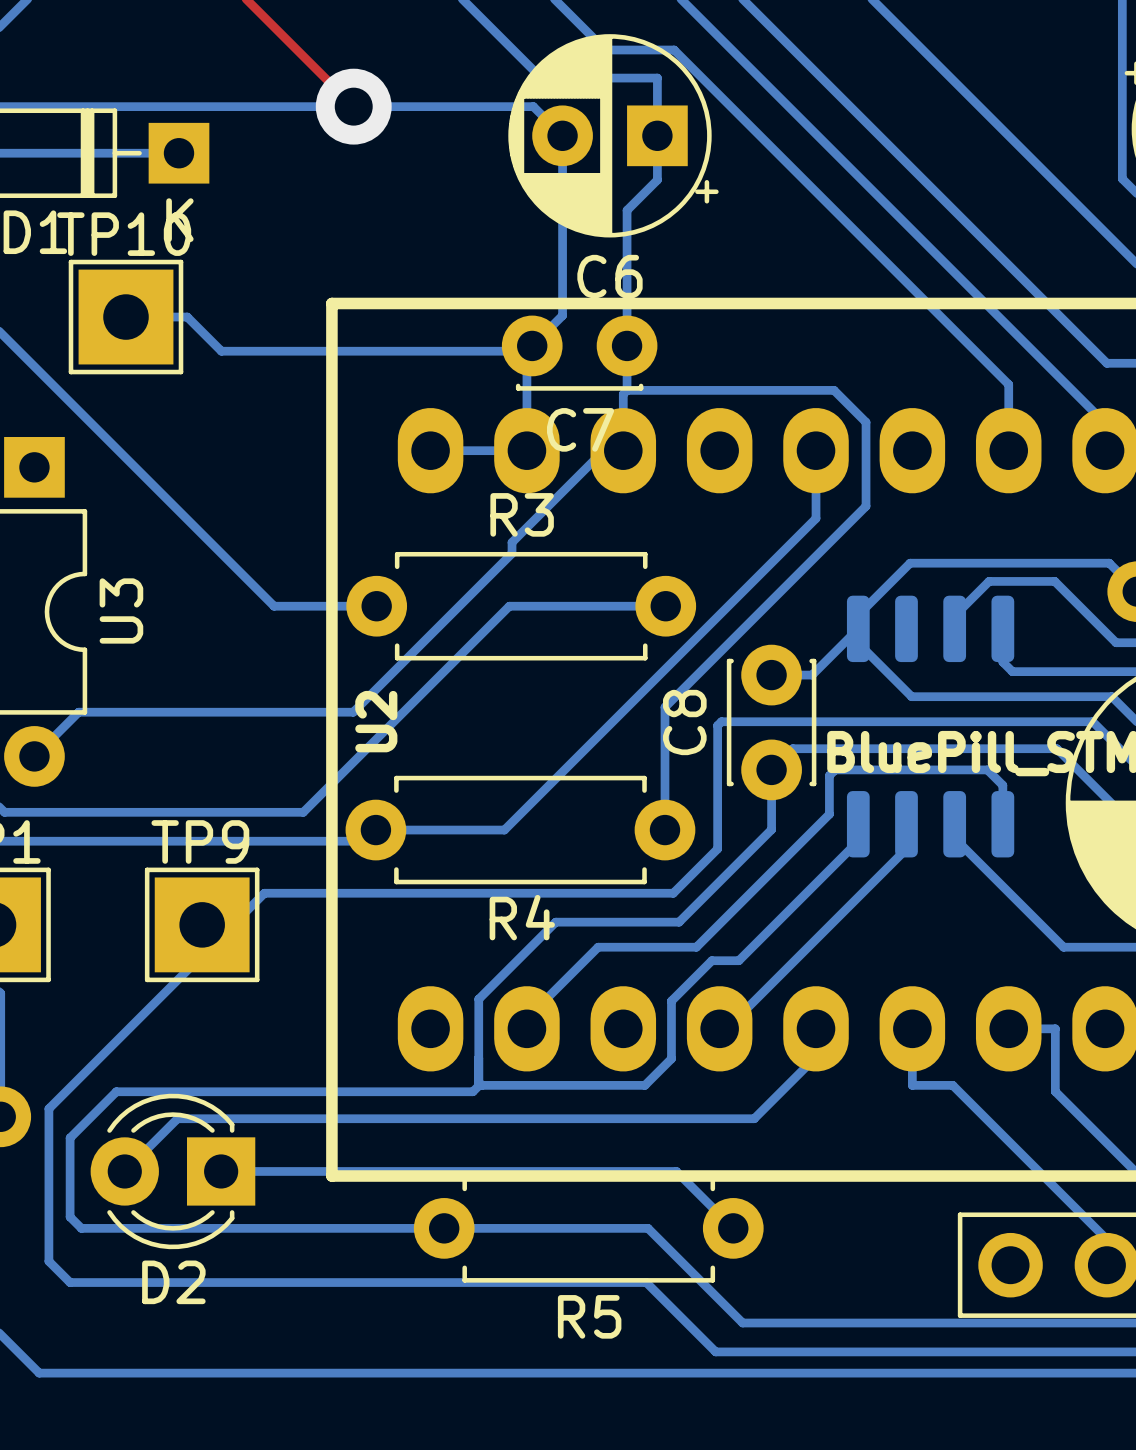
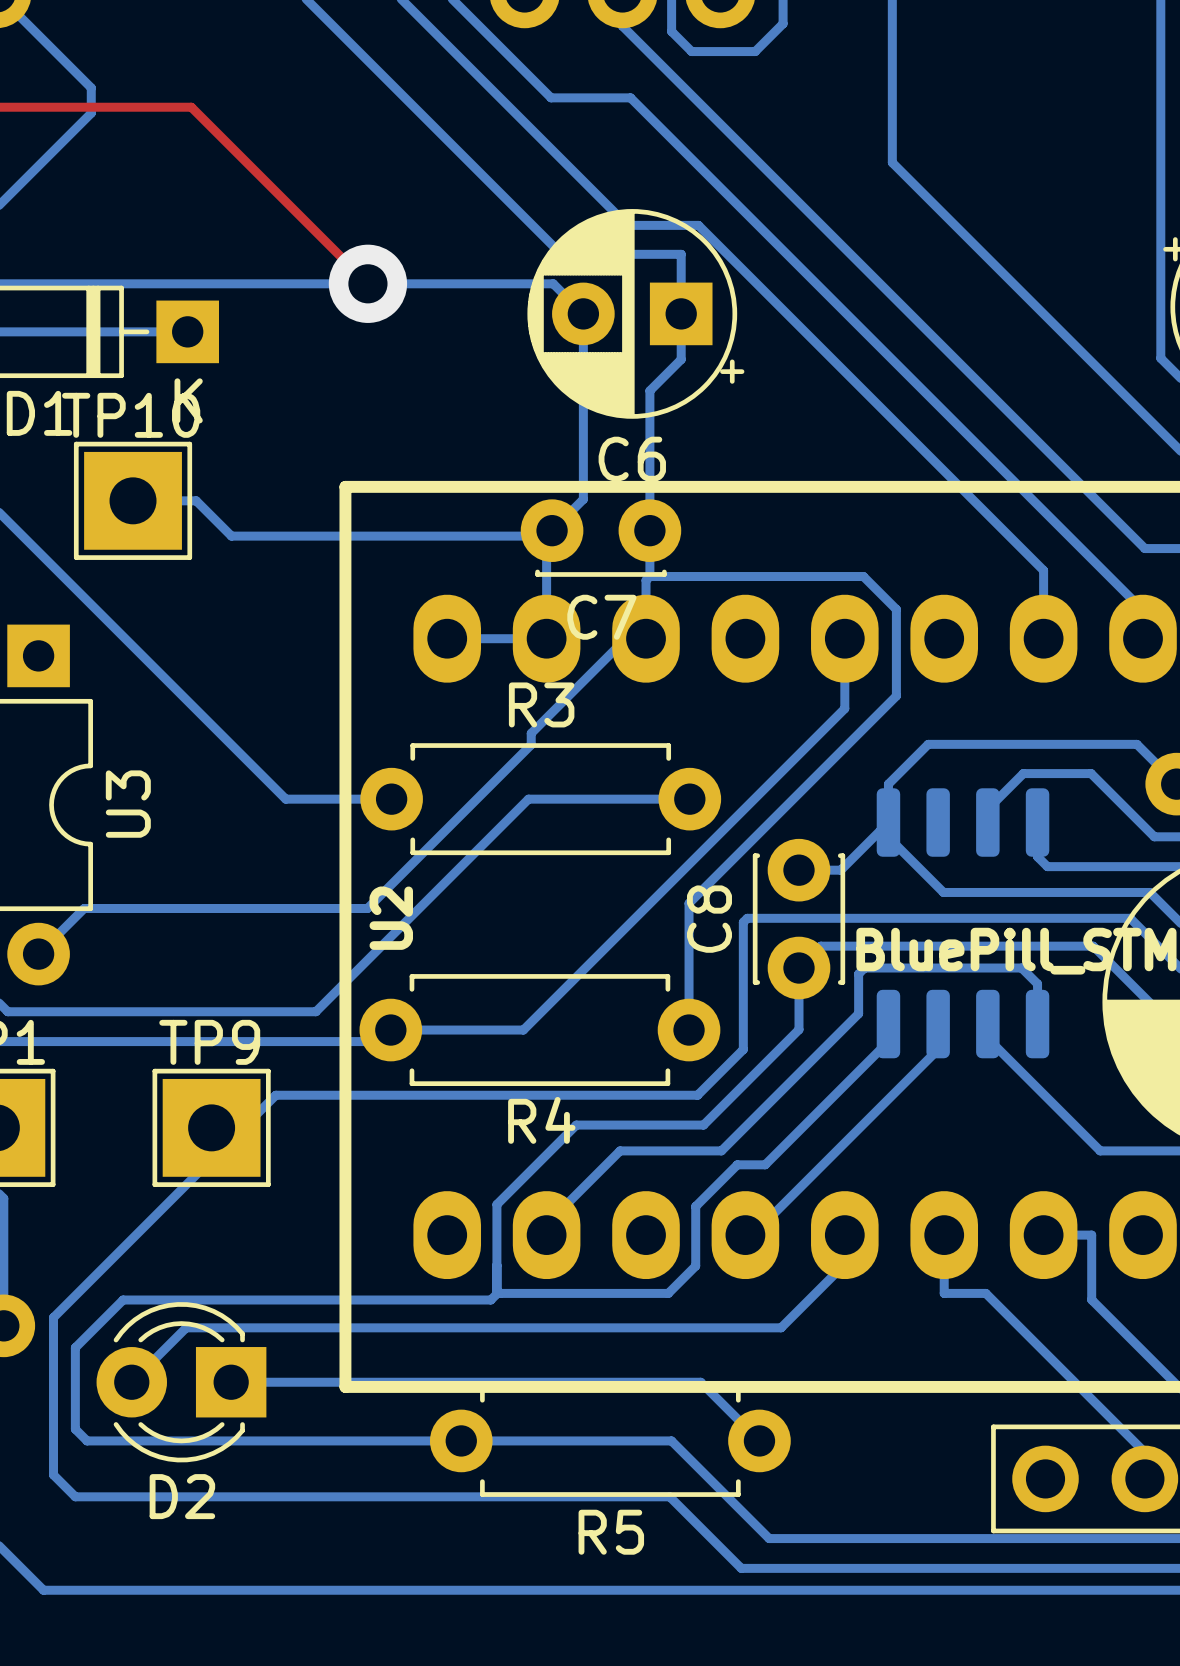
bottom track: (1109, 563) (910, 563) (858, 614) -> (1147, 754) (1136, 744) (928, 744) (888, 784) (888, 808)

